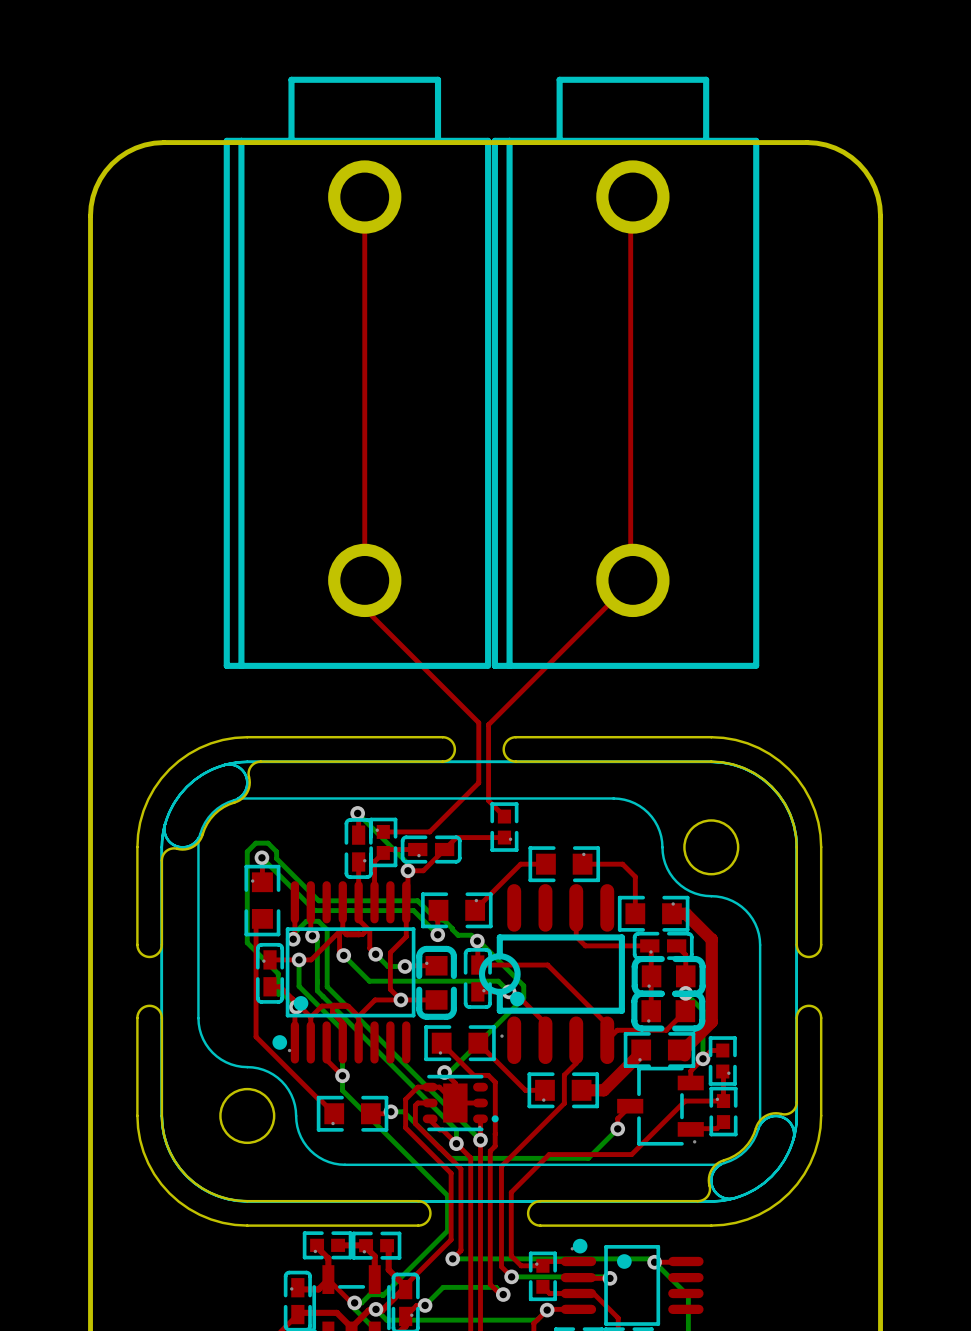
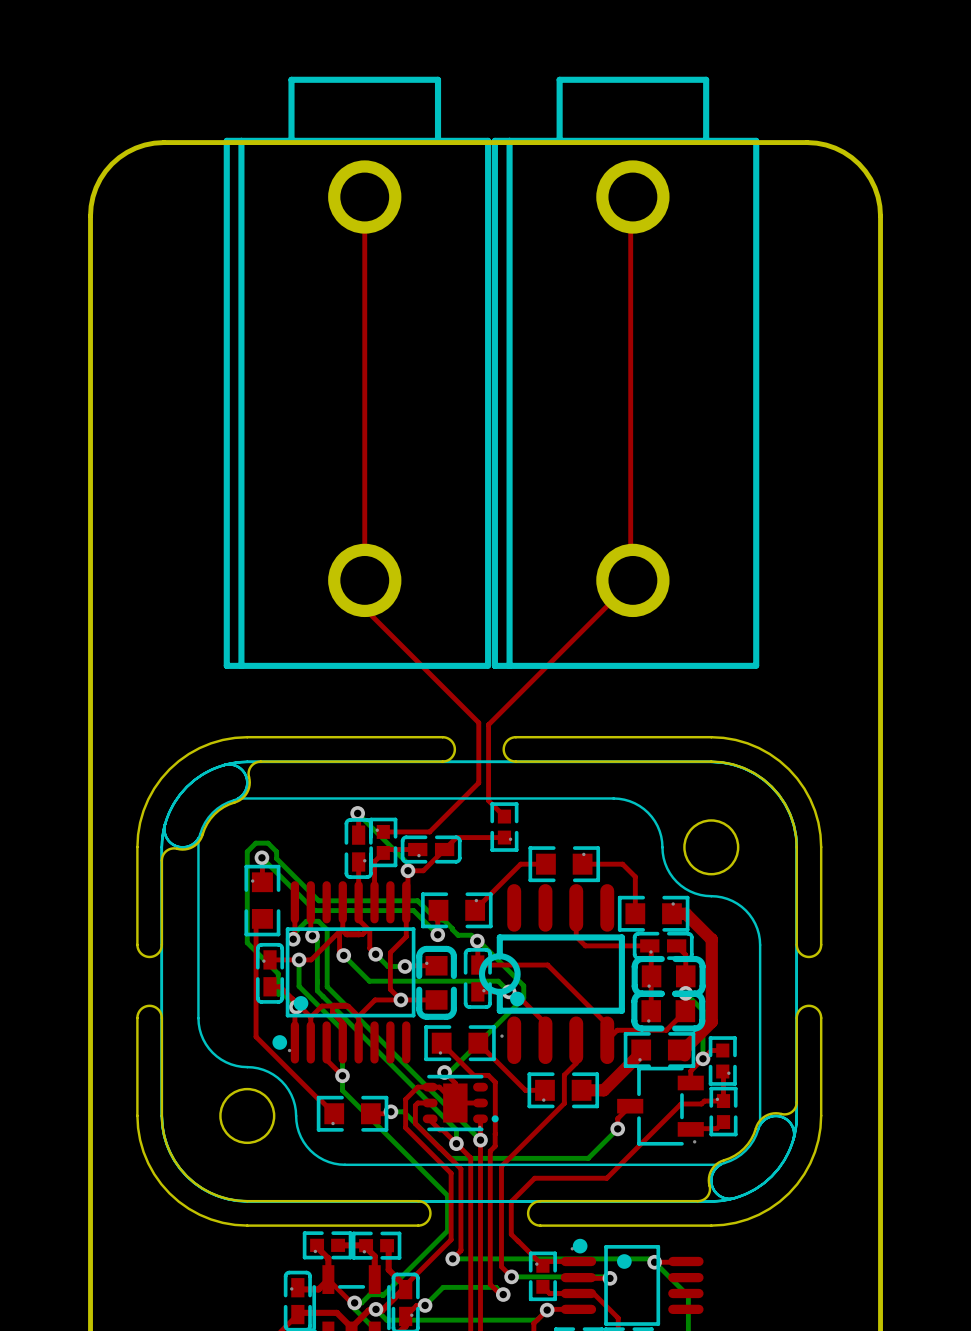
top track: (704, 1101) (685, 1101) (631, 1154) (549, 1154) (511, 1192) (511, 1201) -> (704, 1101) (701, 1103) (681, 1103) (606, 1178) (534, 1178) (511, 1201)
top track: (511, 1234) (511, 1255) (521, 1265) (542, 1265) -> (511, 1234) (518, 1241)
top track: none -> (518, 1241) (542, 1265) (547, 1261)

